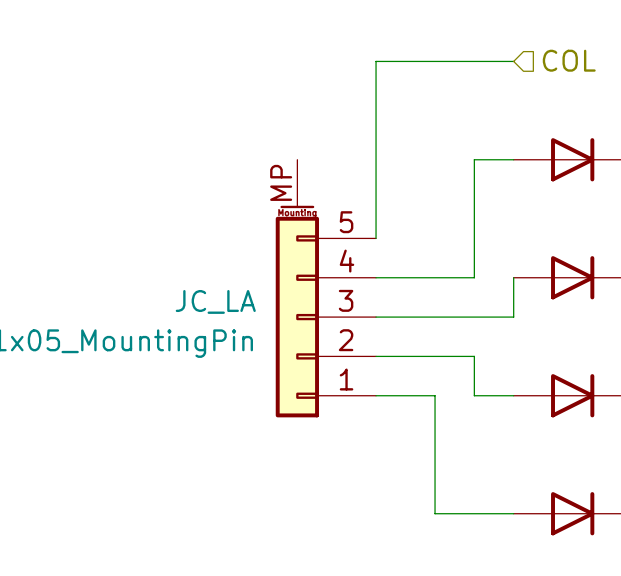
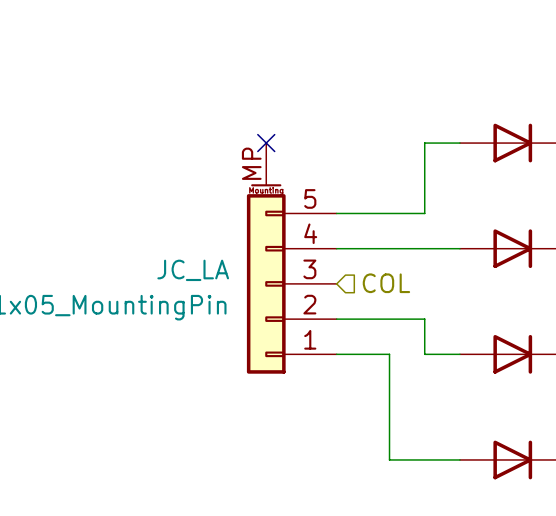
hierarchical label position: COL (569, 60) -> COL (386, 283)
wire: (513, 61) (376, 61) (376, 238) -> (424, 213) (336, 213)
no-connect mark: none -> (266, 143)
wire: (474, 238) (474, 277) -> (459, 248) (424, 248)
wire: (513, 277) (513, 317) (376, 317) -> none

